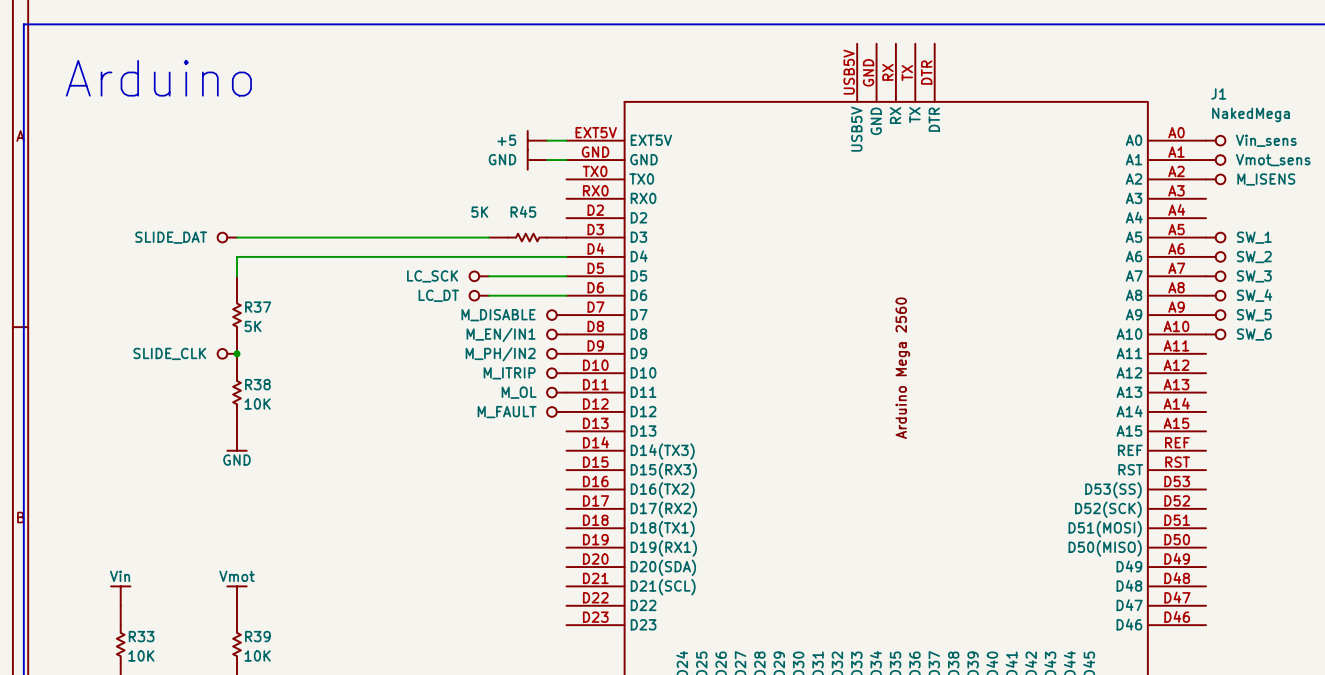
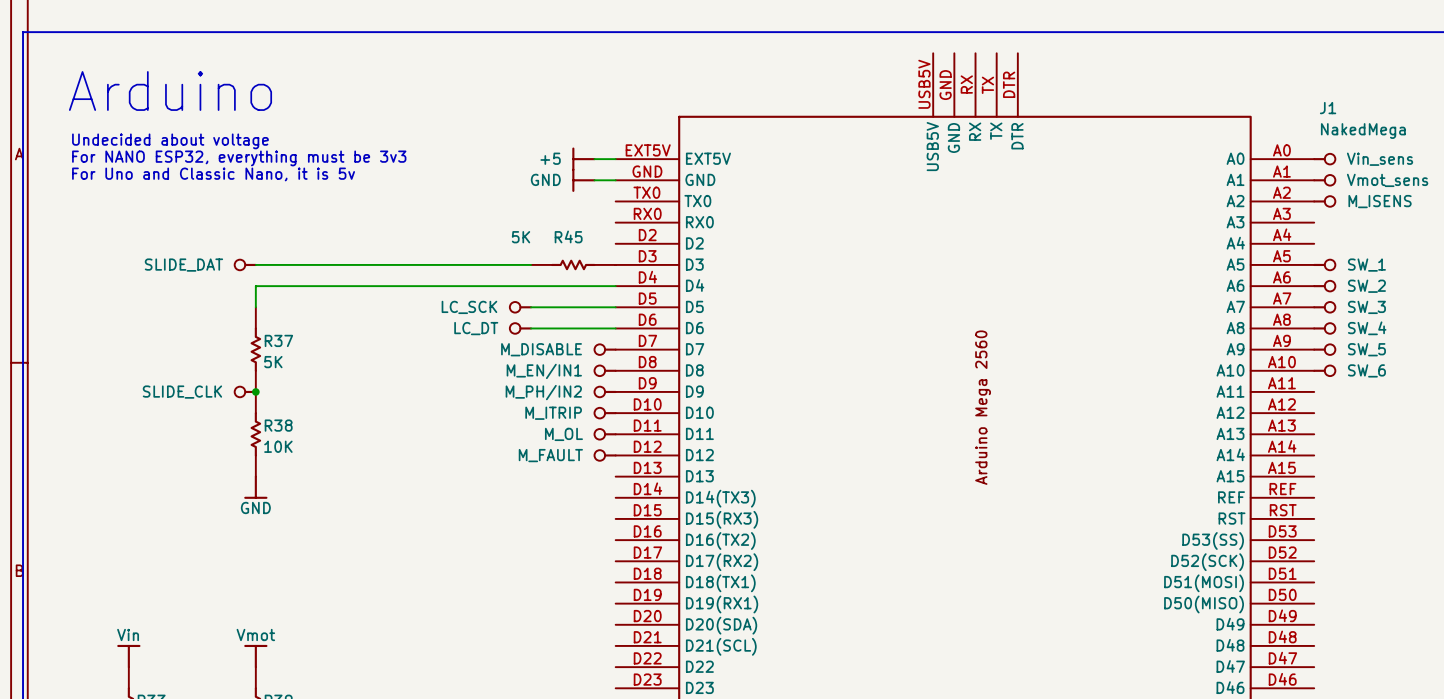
text: none -> Undecided about voltage (170, 141)
text: none -> For NANO ESP32, everything must be 3v3 (239, 158)
text: none -> For Uno and Classic Nano, it is 5v (213, 174)

